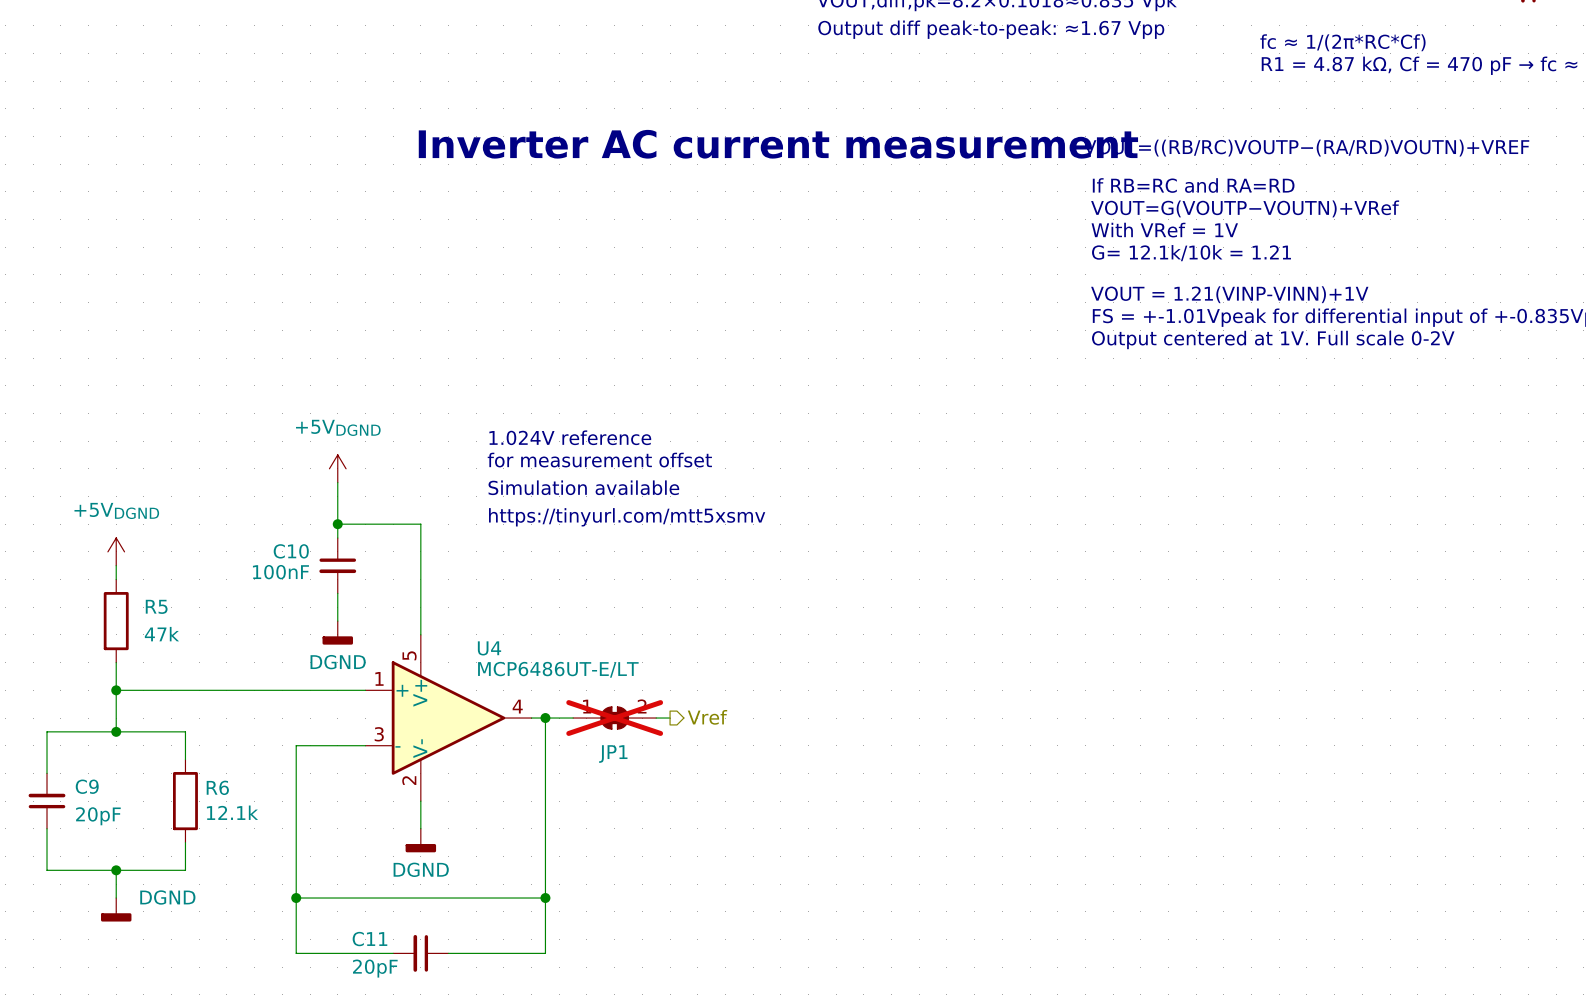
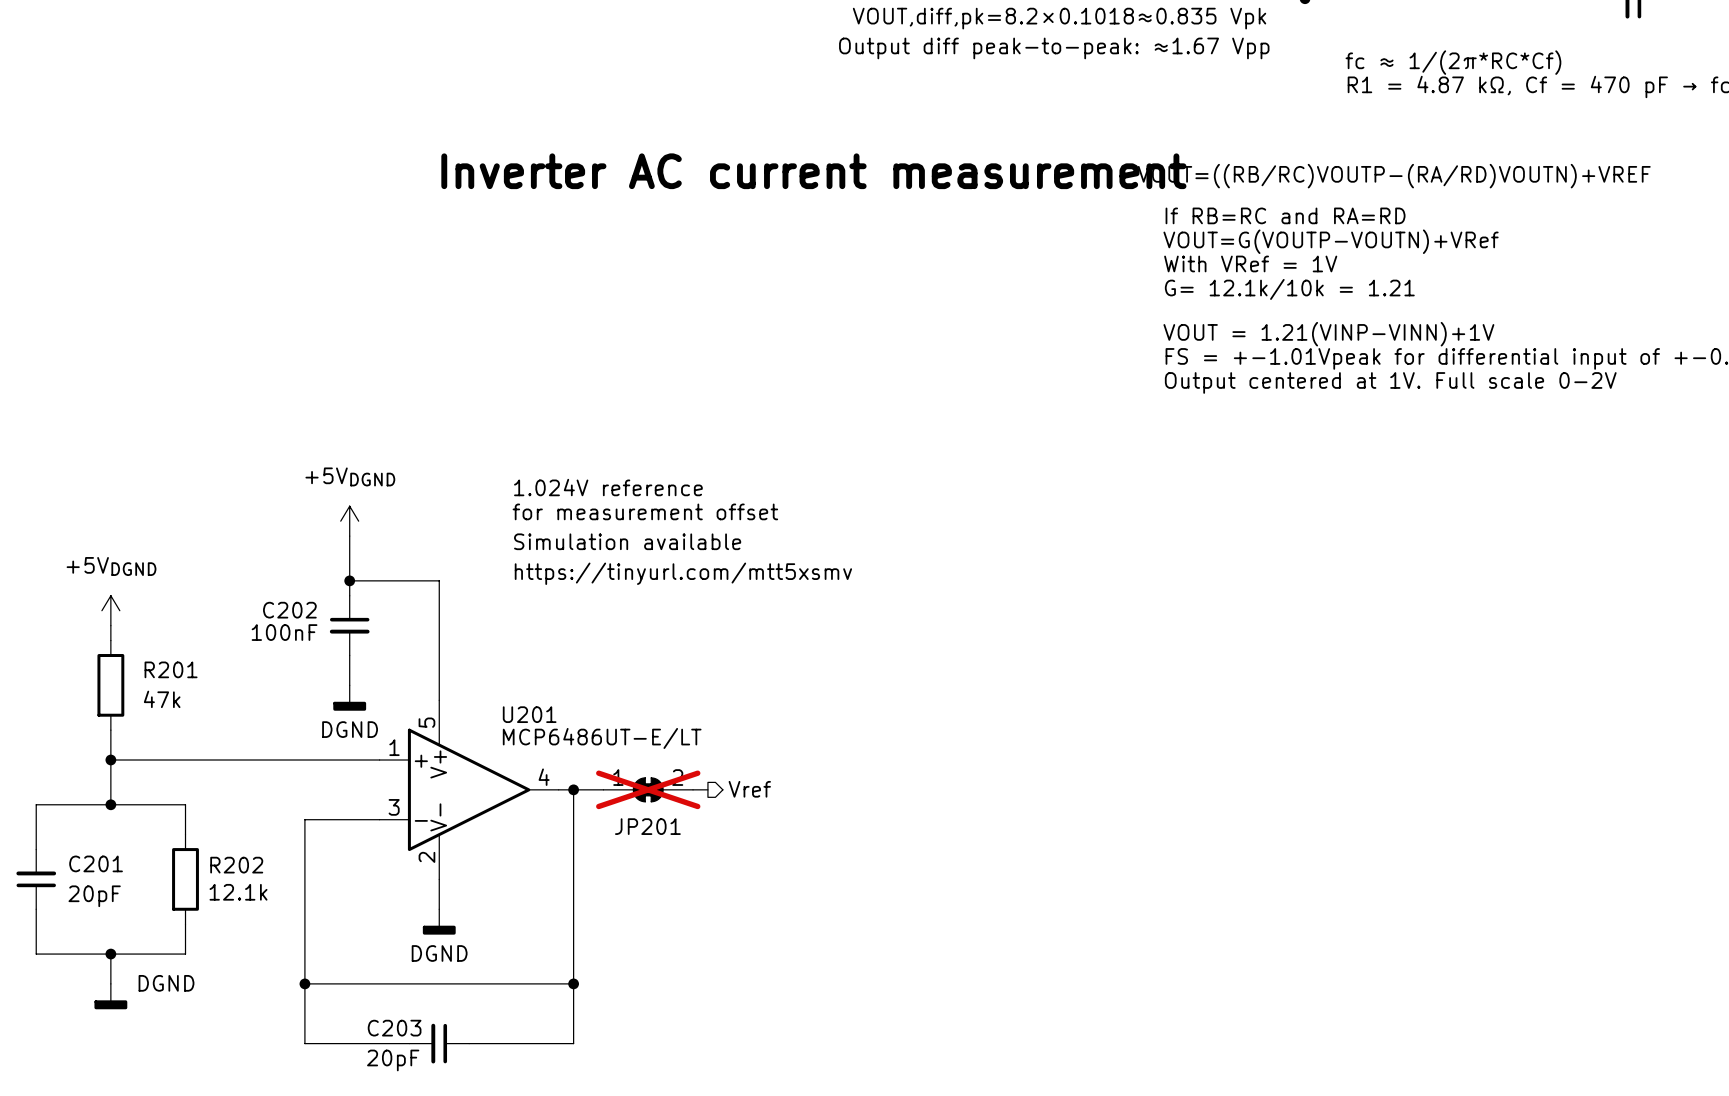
C10 name: C10 (291, 551) -> C202 (289, 610)
R5 name: R5 (156, 606) -> R201 (171, 669)
U4 name: U4 (489, 648) -> U201 (529, 714)
JP1 name: JP1 (613, 754) -> JP201 (647, 826)
C9 name: C9 (87, 786) -> C201 (96, 863)
R6 name: R6 (217, 787) -> R202 (236, 865)
C11 name: C11 (369, 939) -> C203 (394, 1028)

